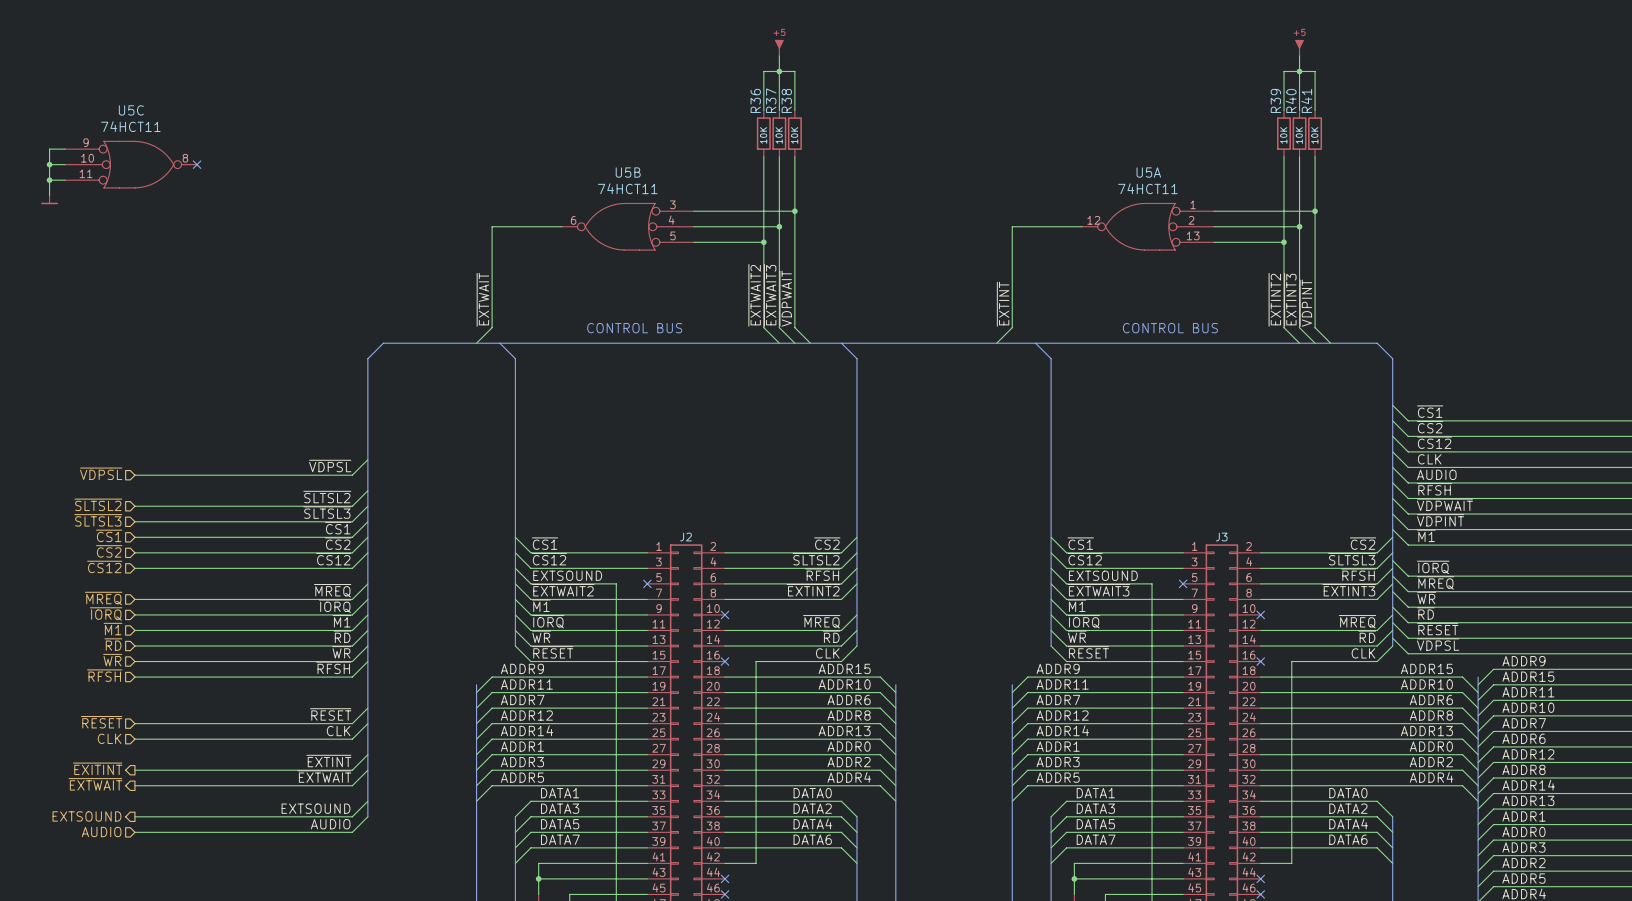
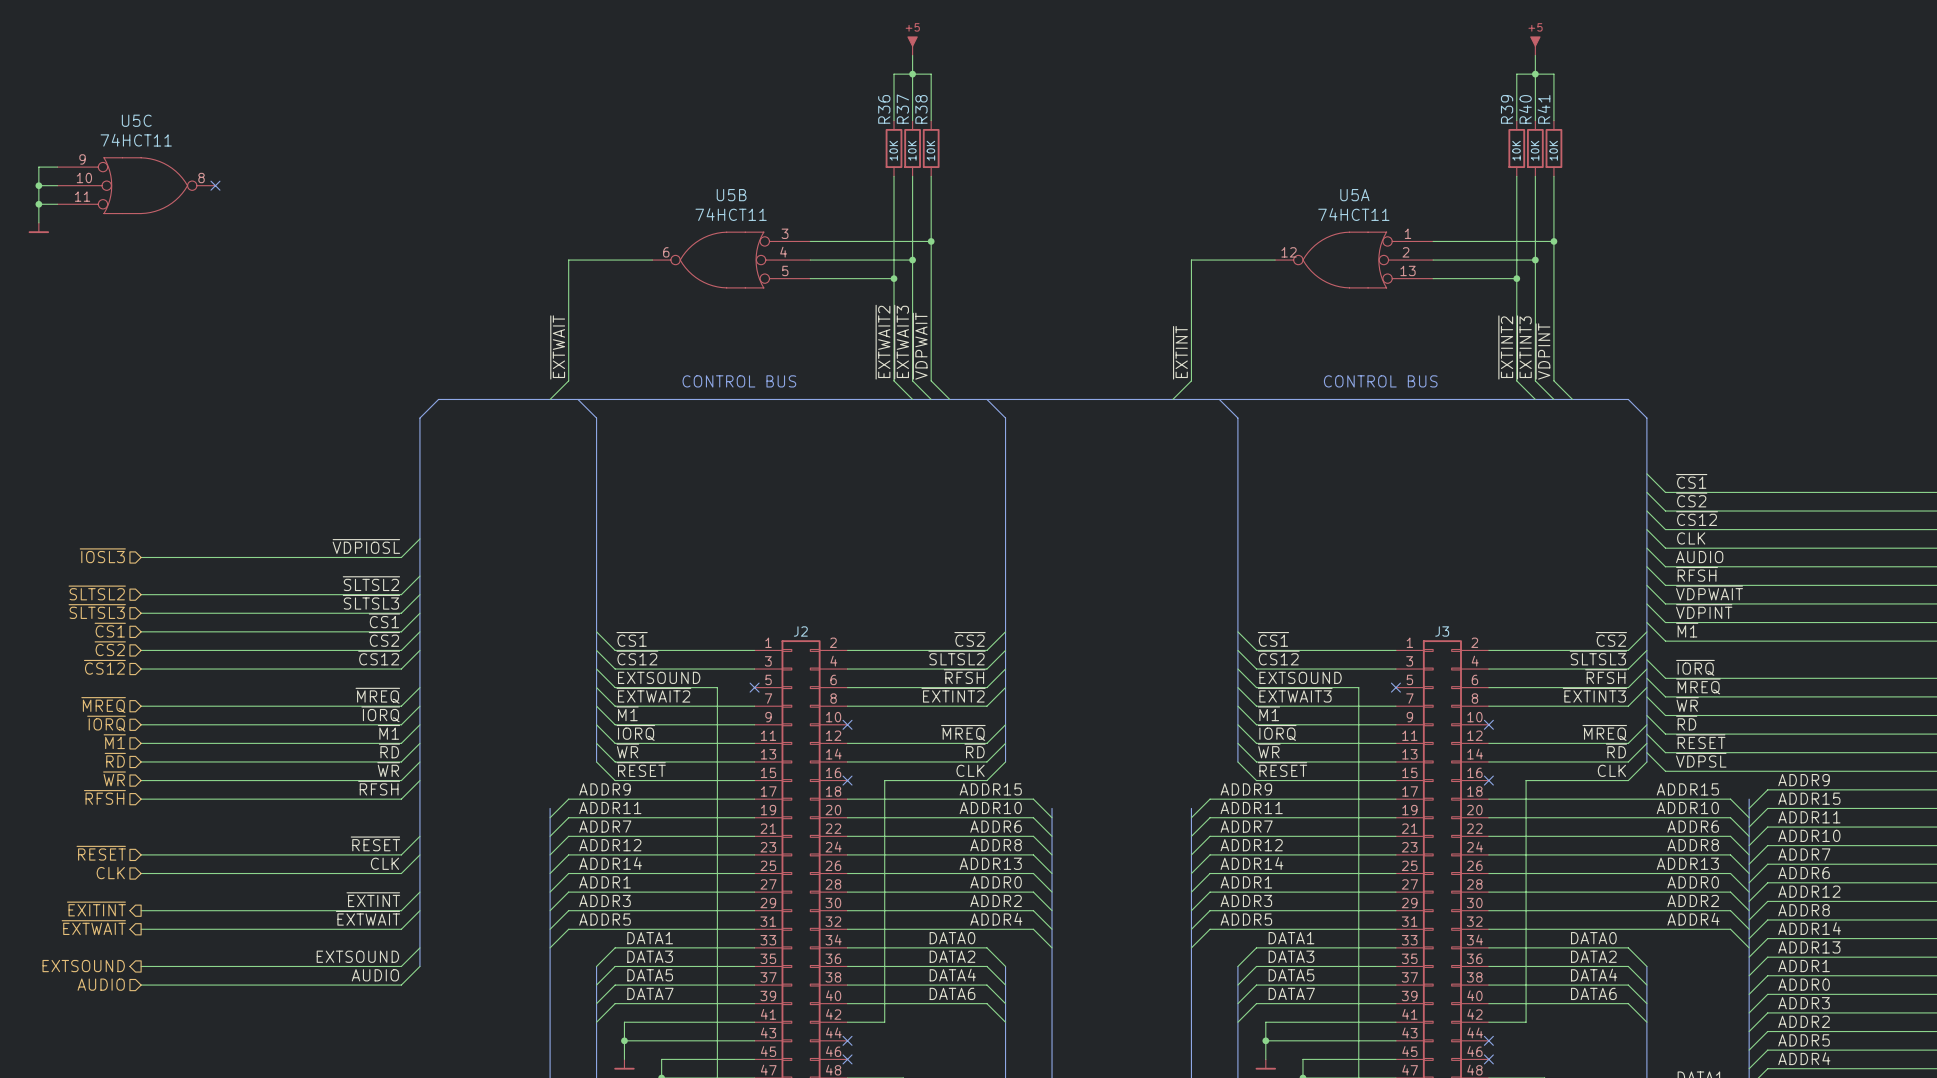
label: ~{VDPSL} (330, 466) -> ~{VDPIOSL} (366, 546)
hierarchical label: ~{VDPSL} (101, 473) -> ~{IOSL3} (102, 555)

